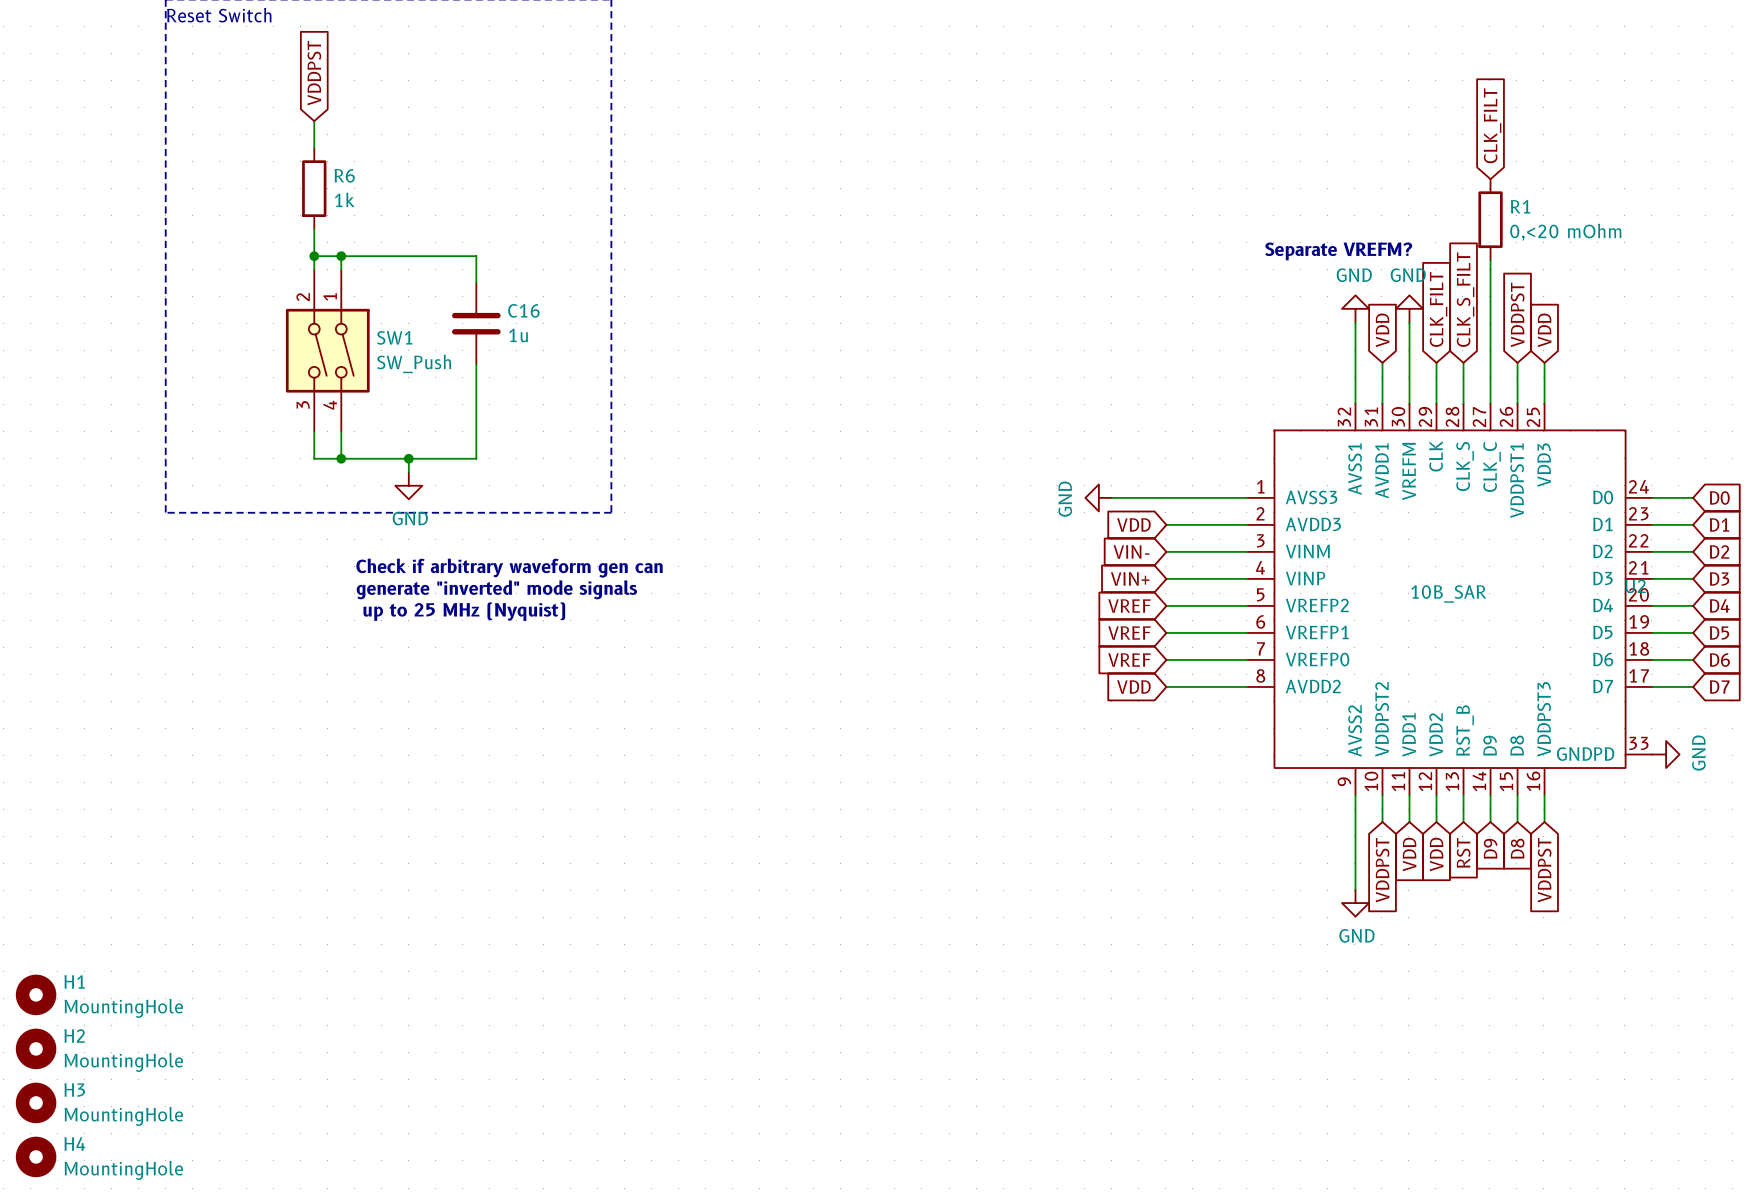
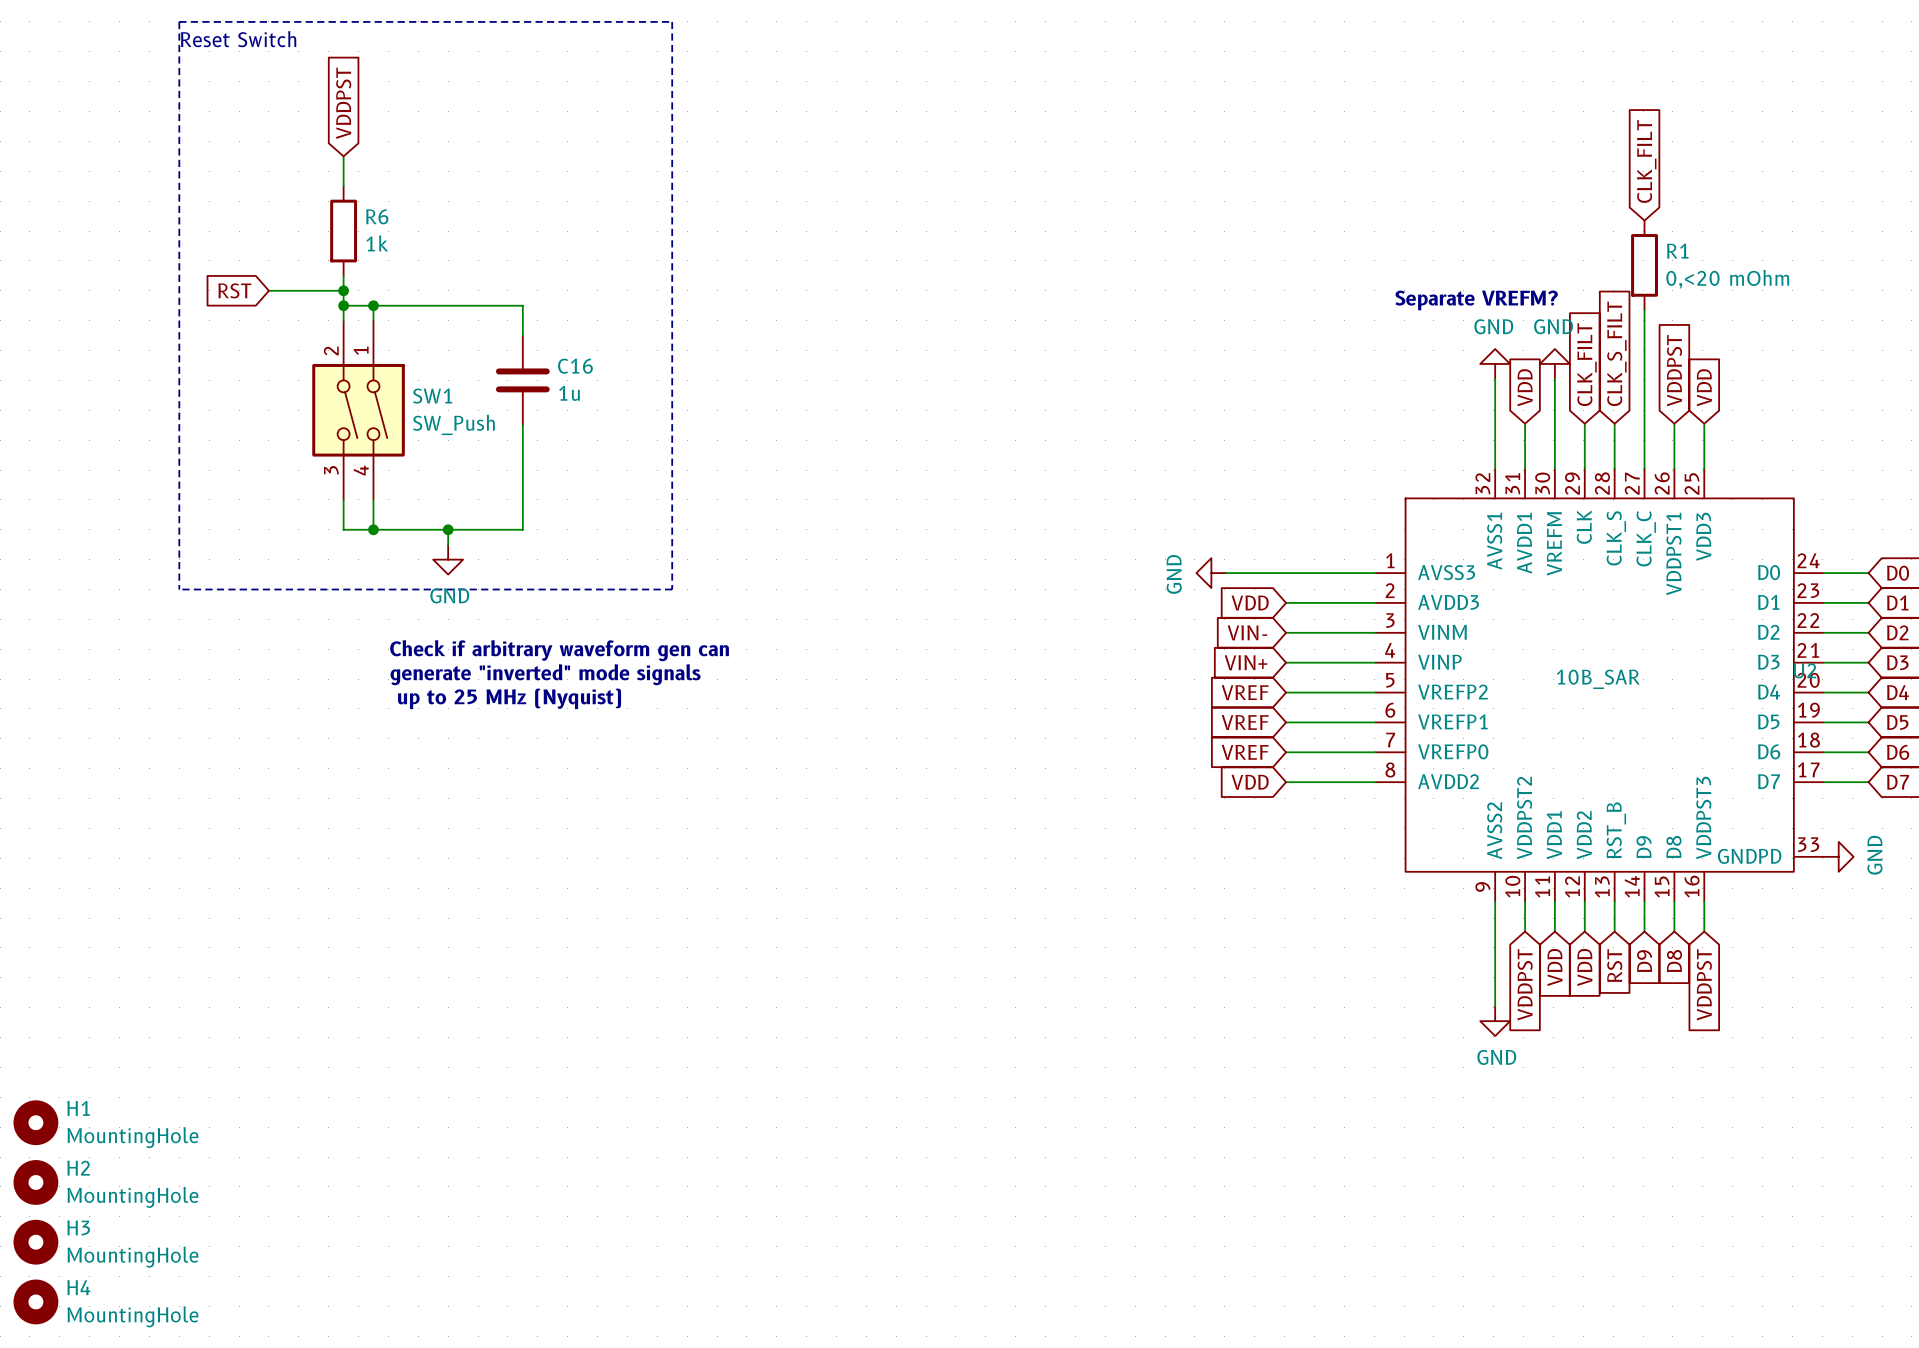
global label: none -> RST (234, 290)
wire: none -> (268, 290) (343, 290)
junction: none -> (343, 290)

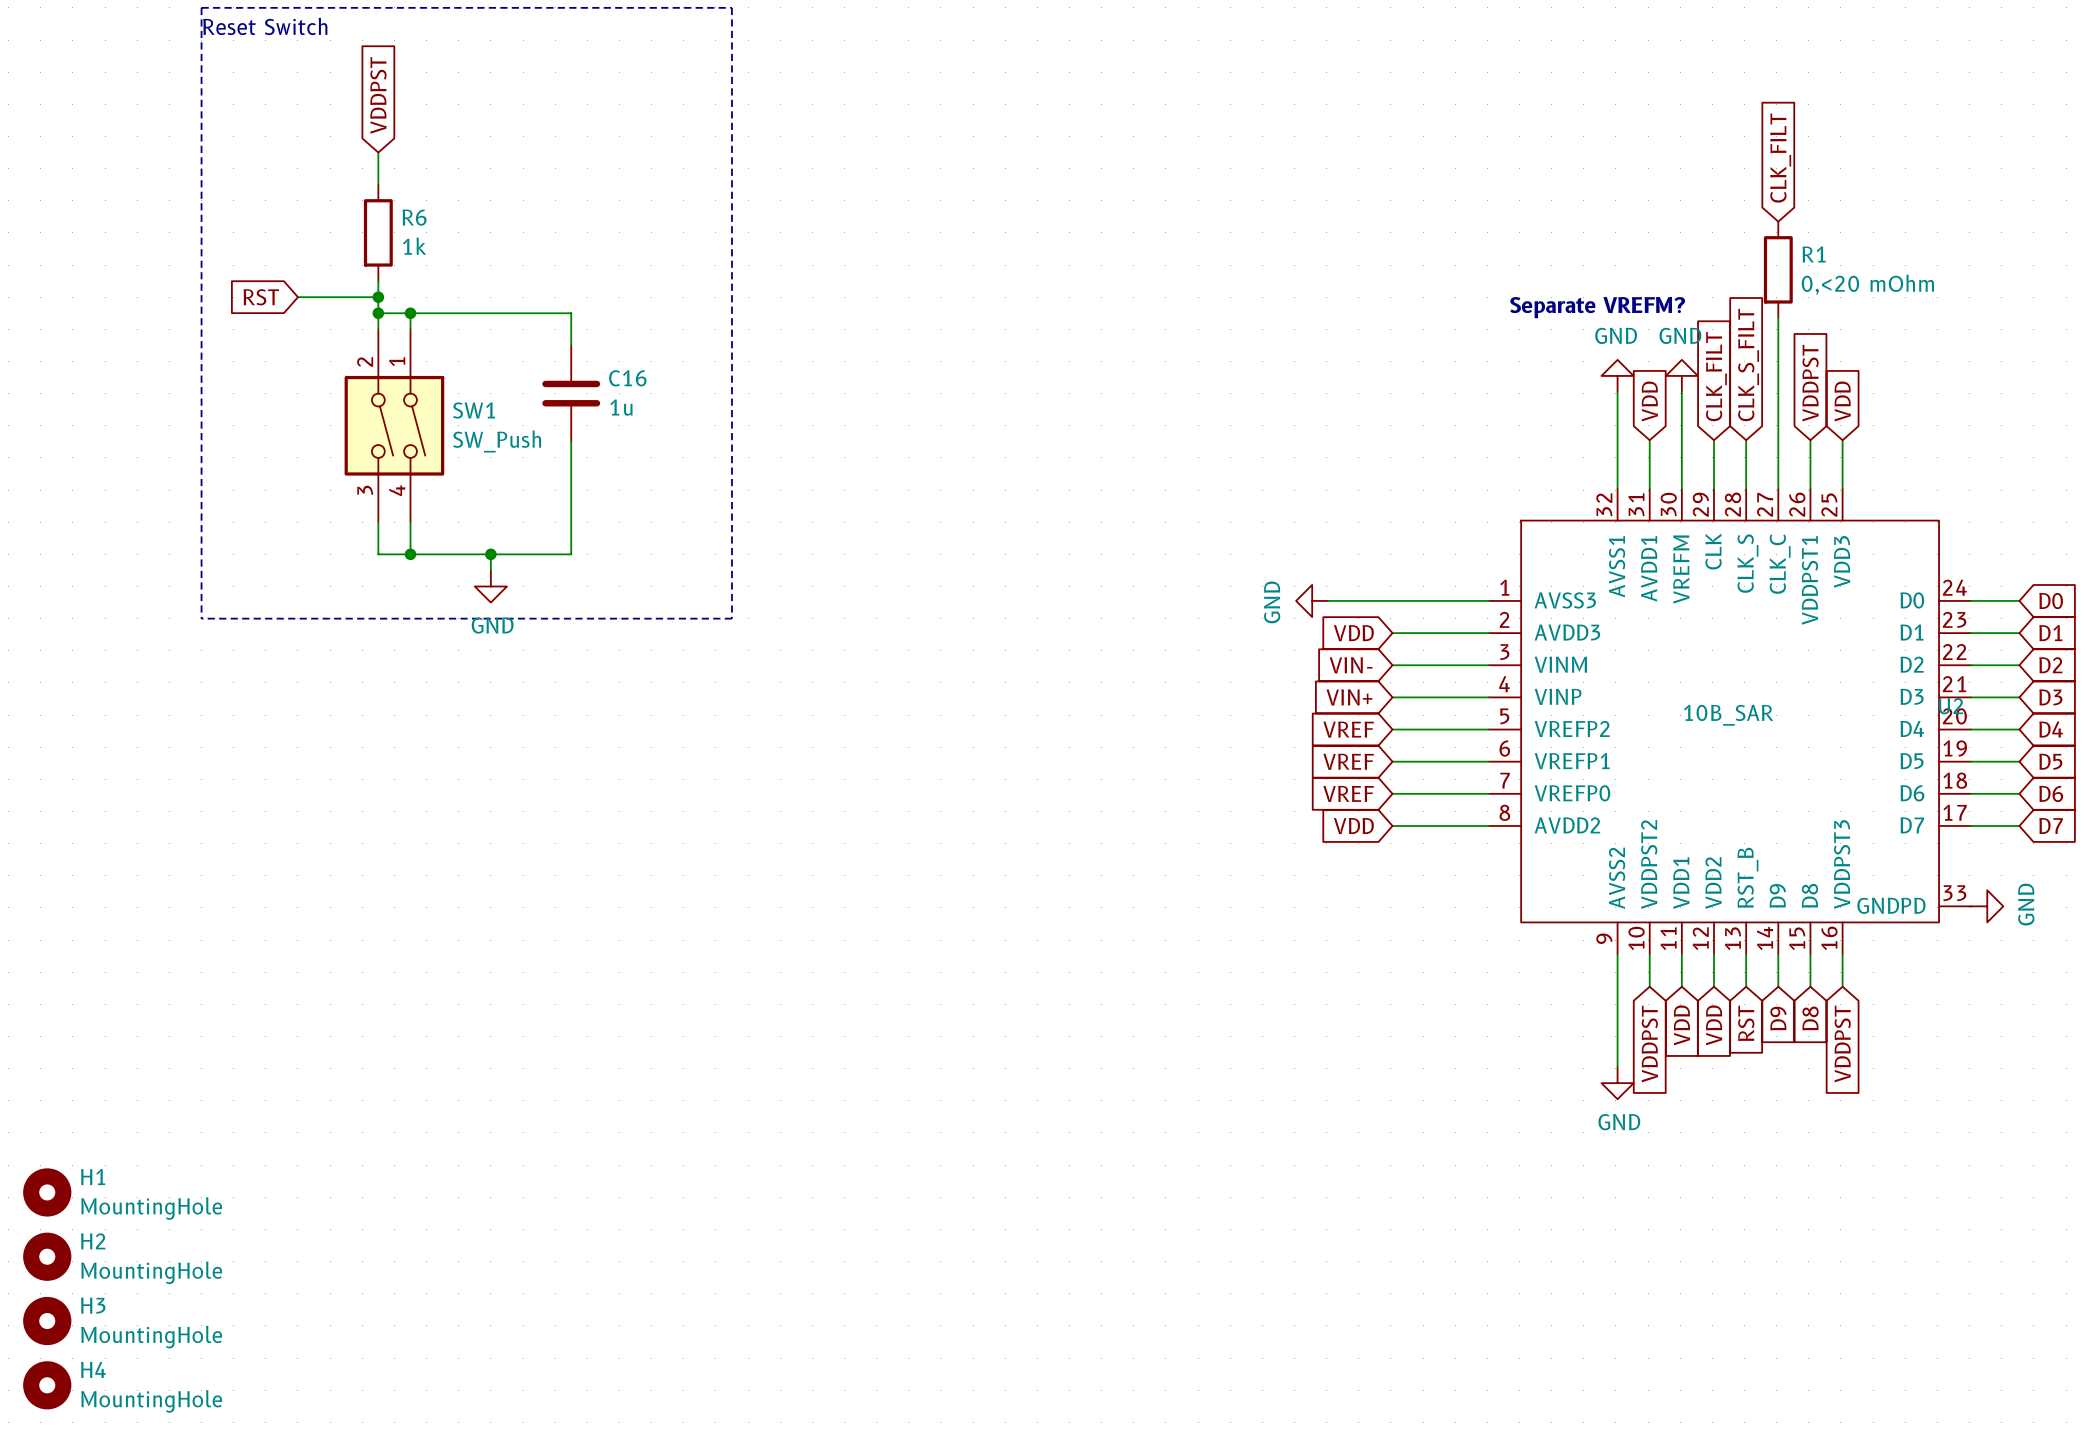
text: Check if arbitrary waveform gen can (559, 650) -> none
text: generate "inverted" mode signals (545, 674) -> none
text: up to 25 MHz (Nyquist) (509, 698) -> none

